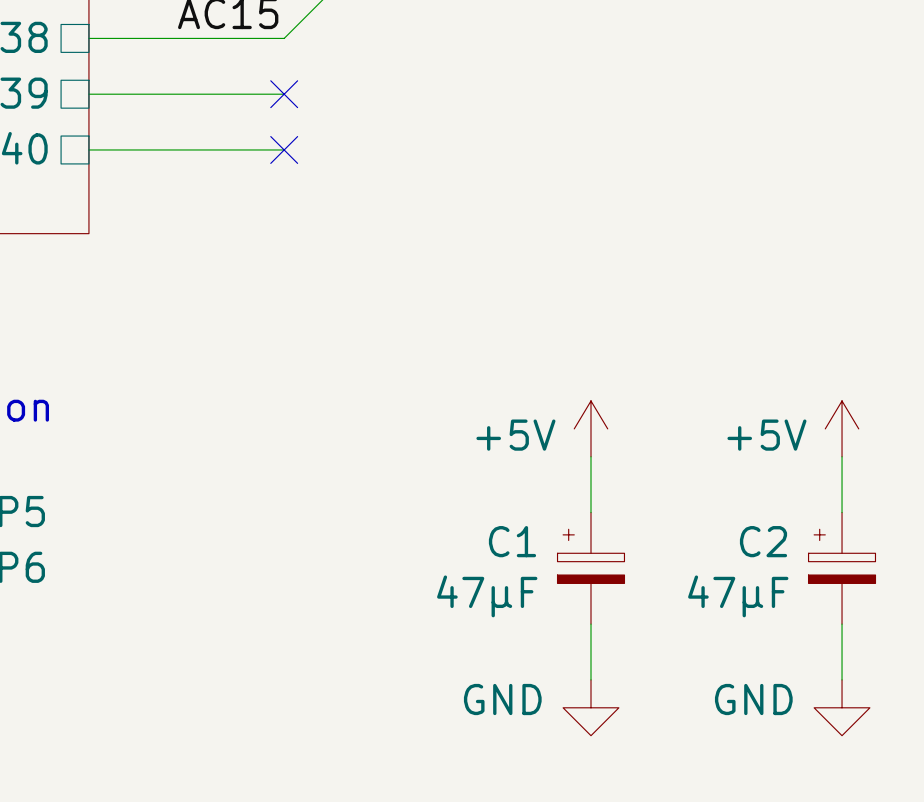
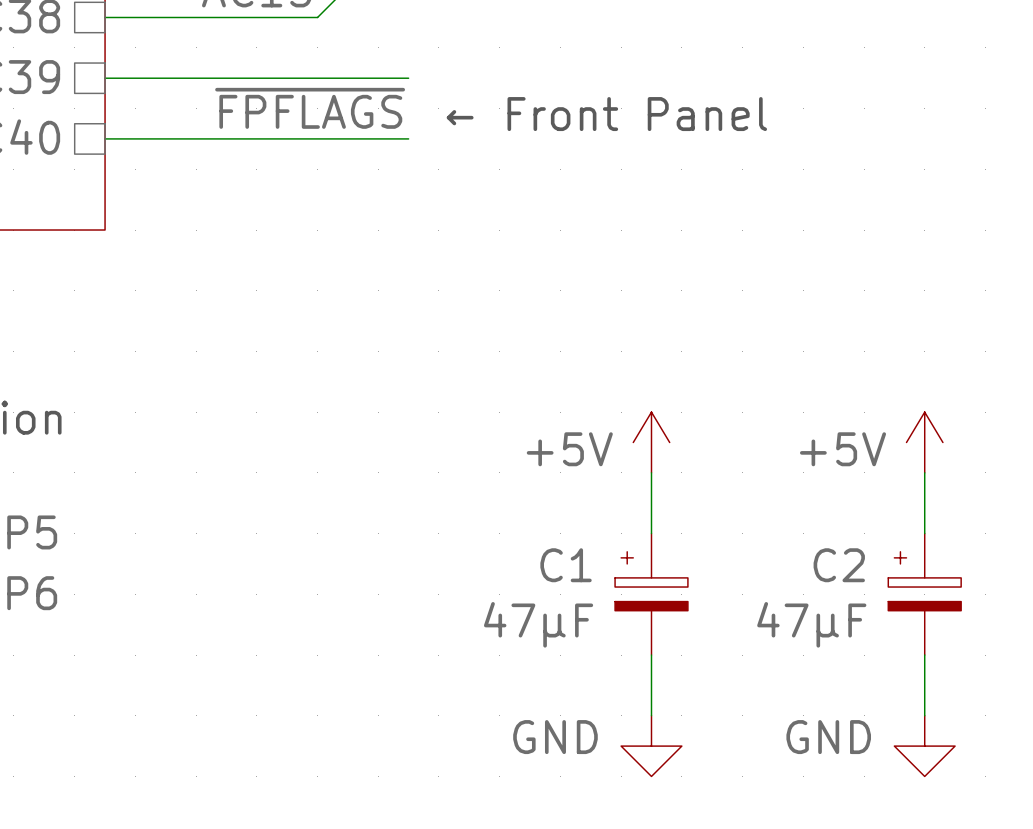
wire: none -> (317, 78) (408, 78)
no-connect mark: (284, 94) -> none
label: none -> ~{FPFLAGS} (310, 108)
text: none -> ← Front Panel (606, 114)
wire: none -> (317, 138) (408, 138)
no-connect mark: (284, 149) -> none

